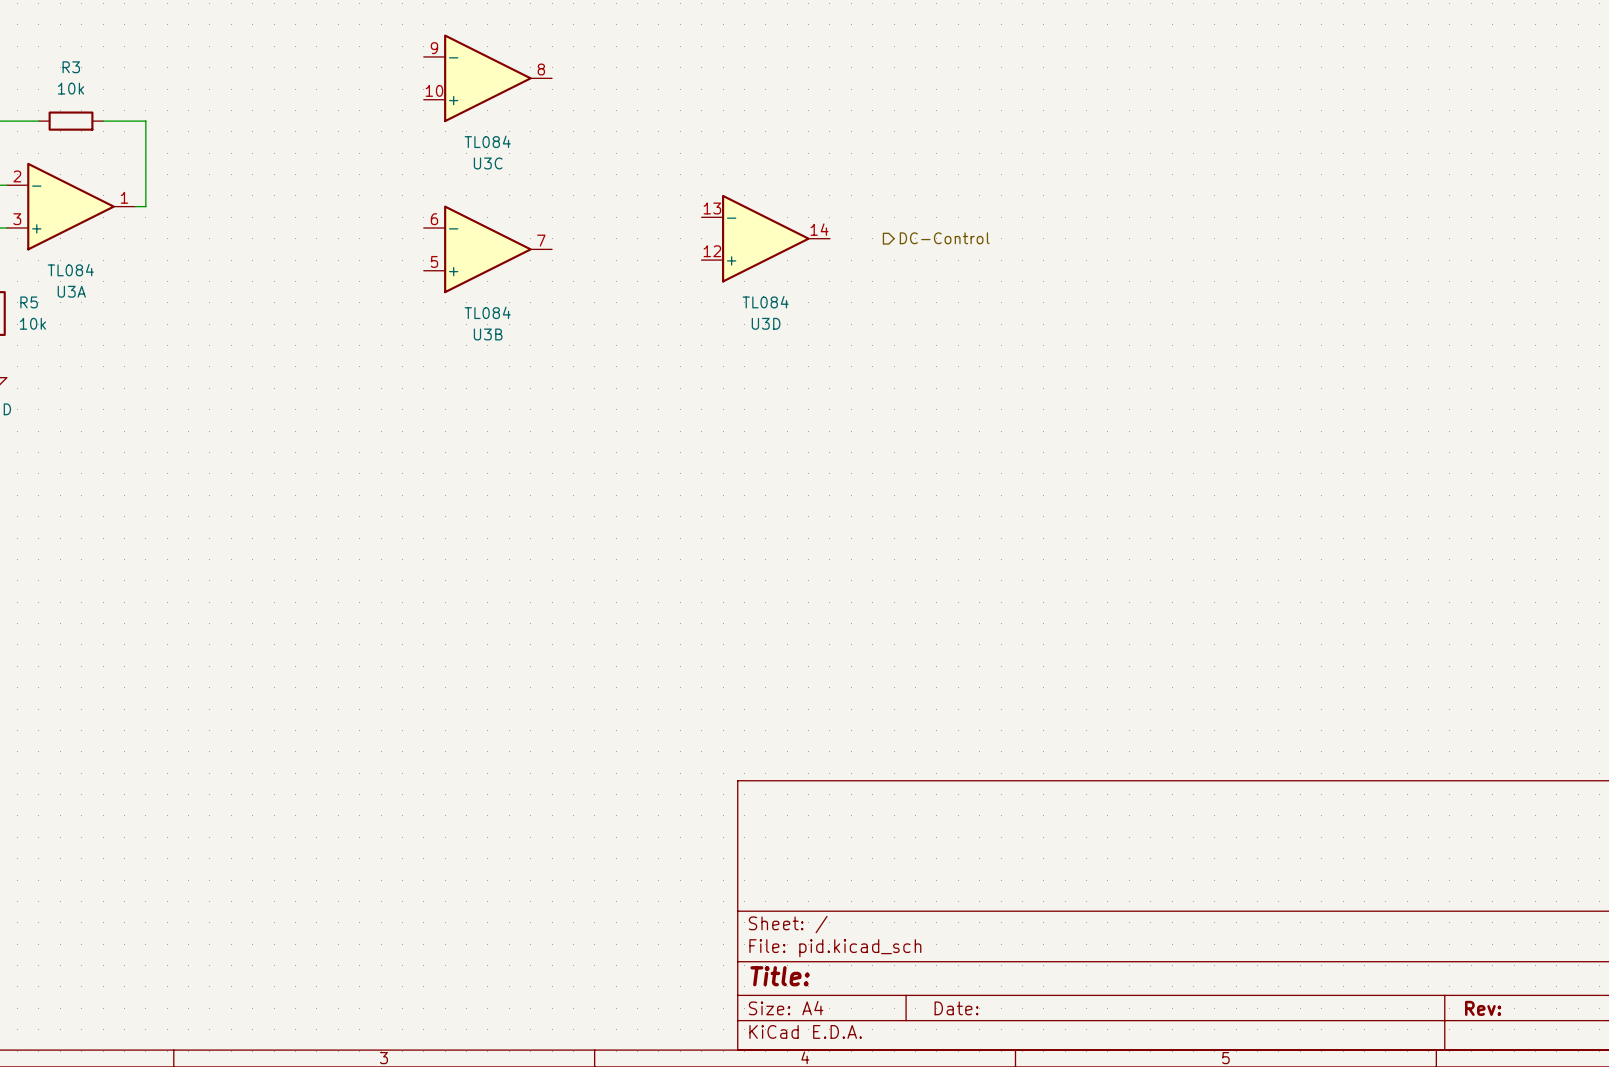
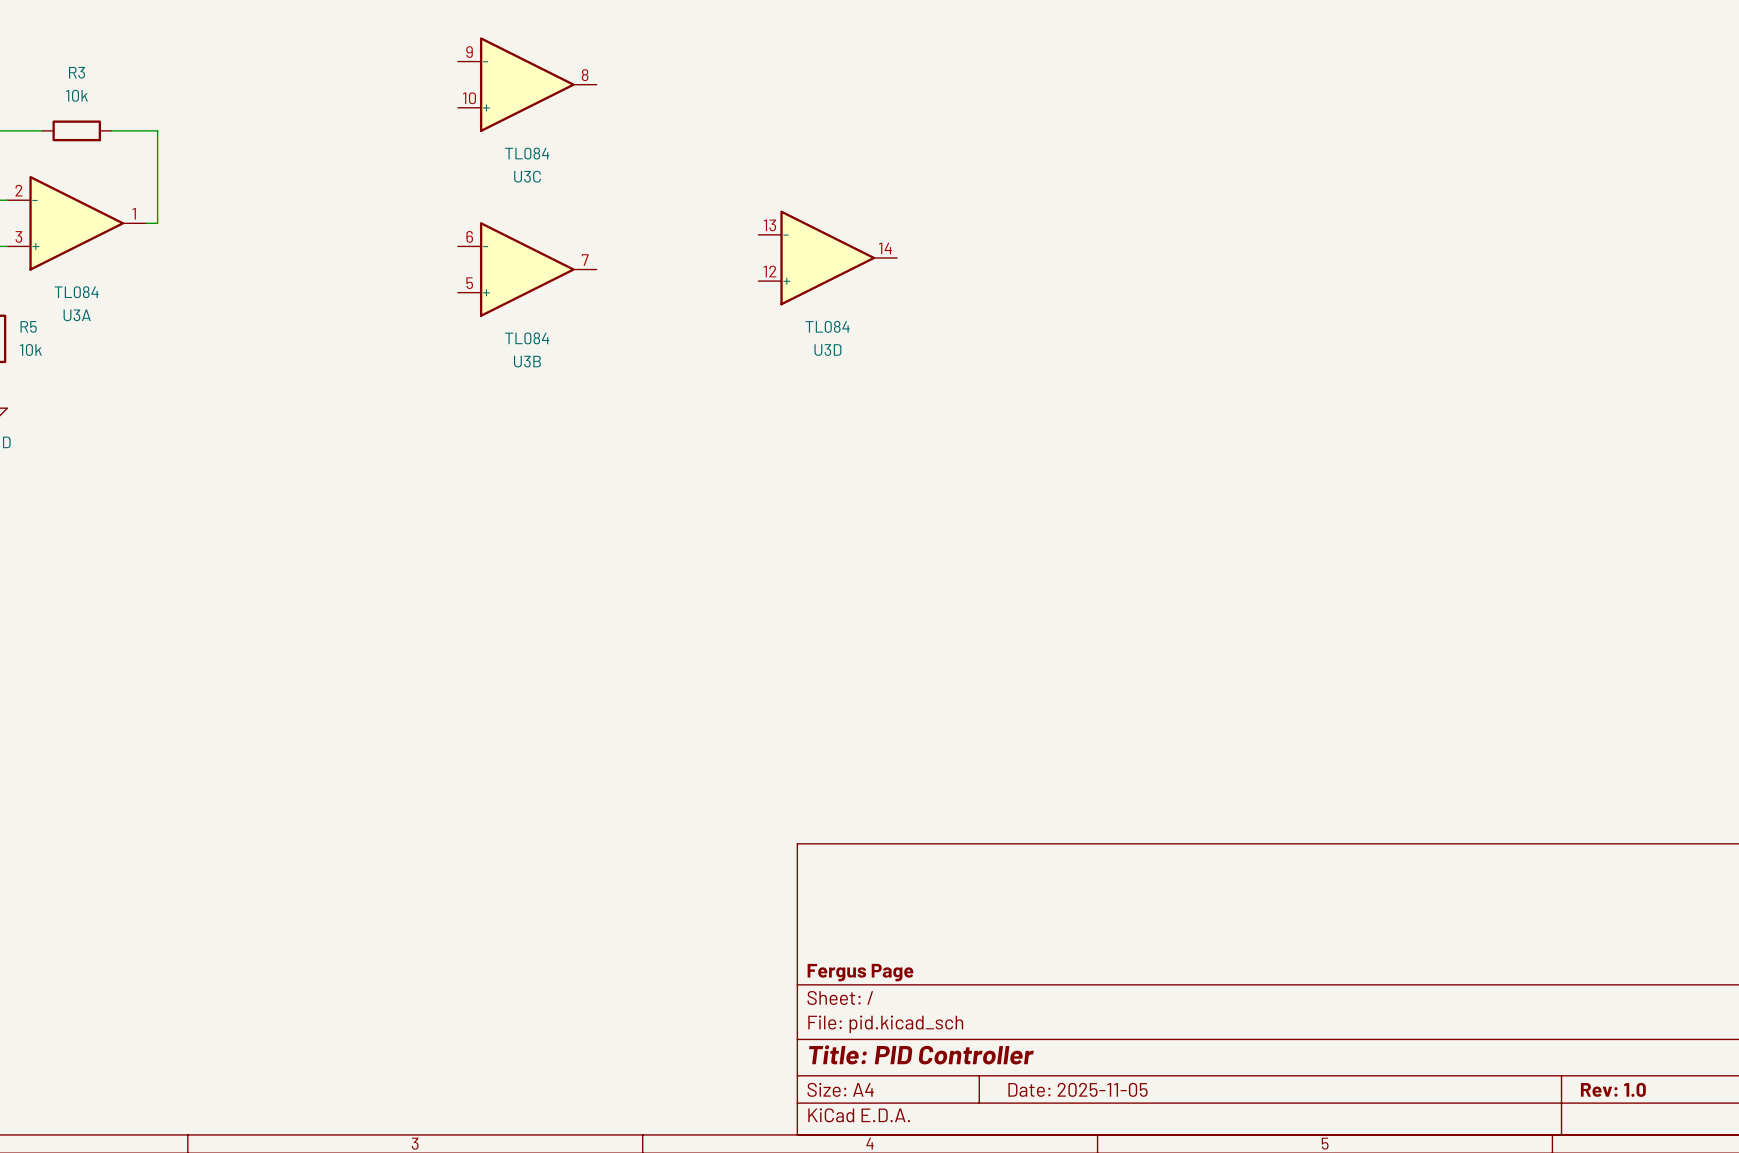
hierarchical label: DC-Control (944, 238) -> none
title block: none -> Fergus Page (860, 972)
title block: Title: (780, 976) -> Title: PID Controller (921, 1054)
title block: Date: (956, 1008) -> Date: 2025-11-05 (1078, 1089)
title block: Rev: (1483, 1008) -> Rev: 1.0 (1613, 1089)

